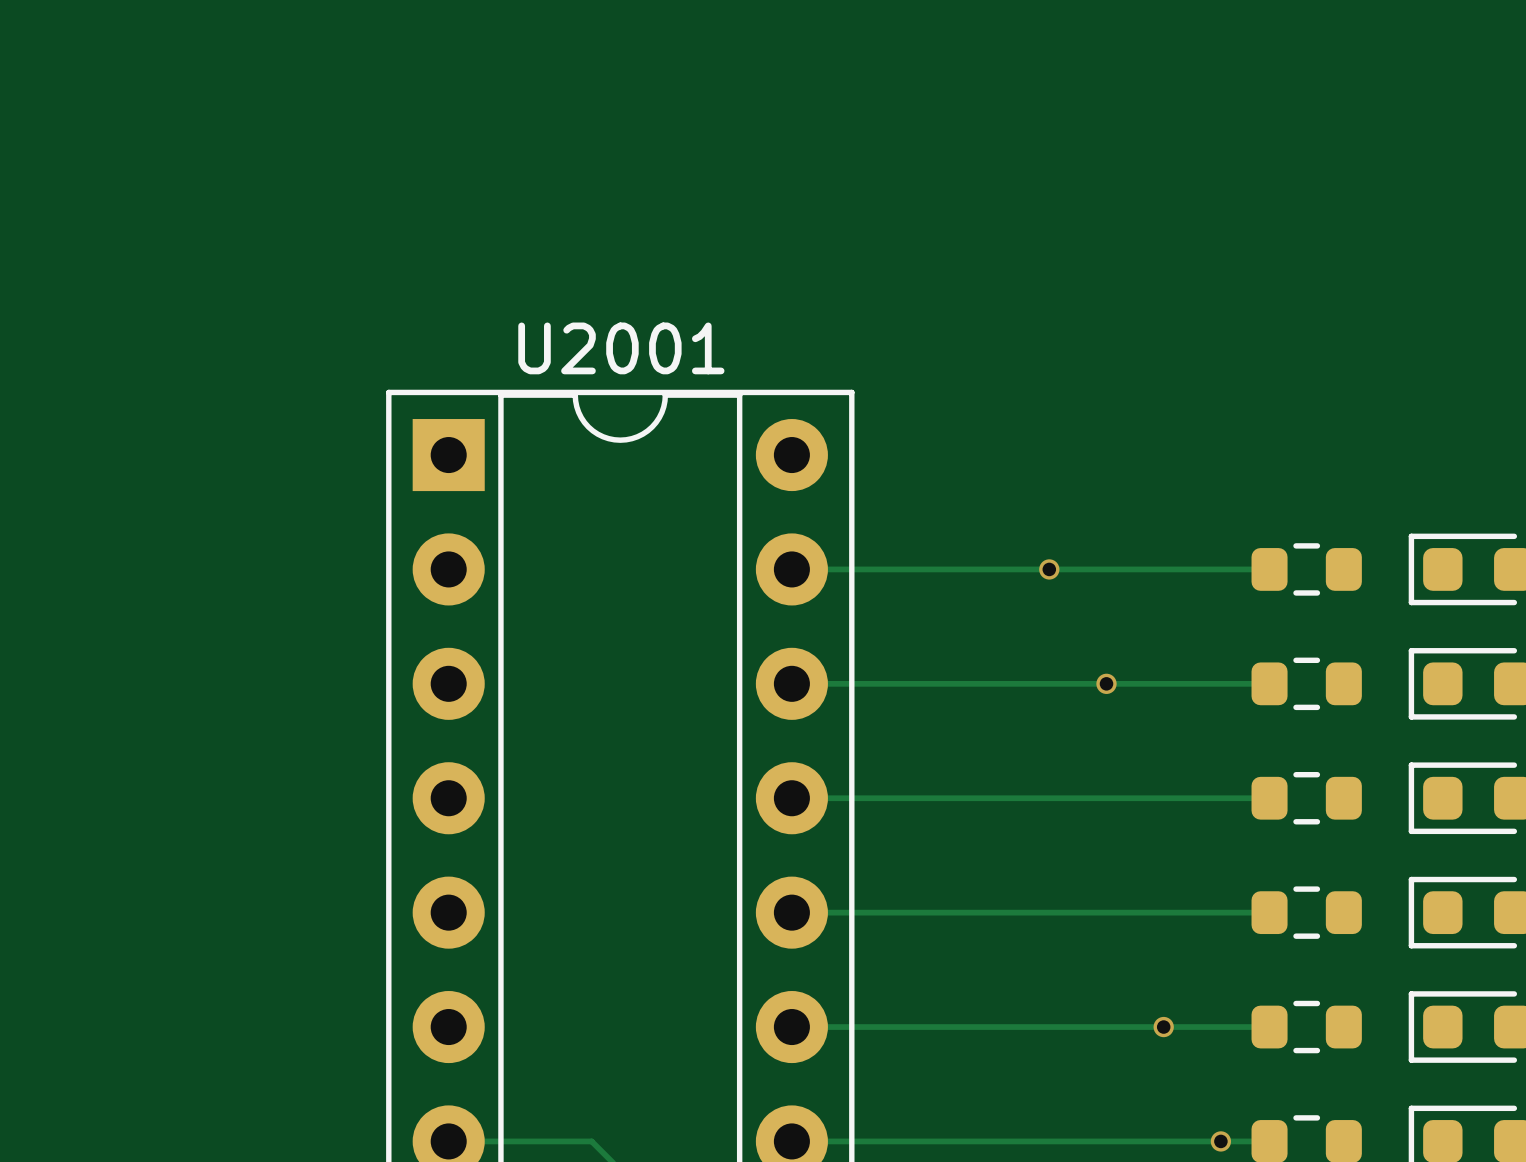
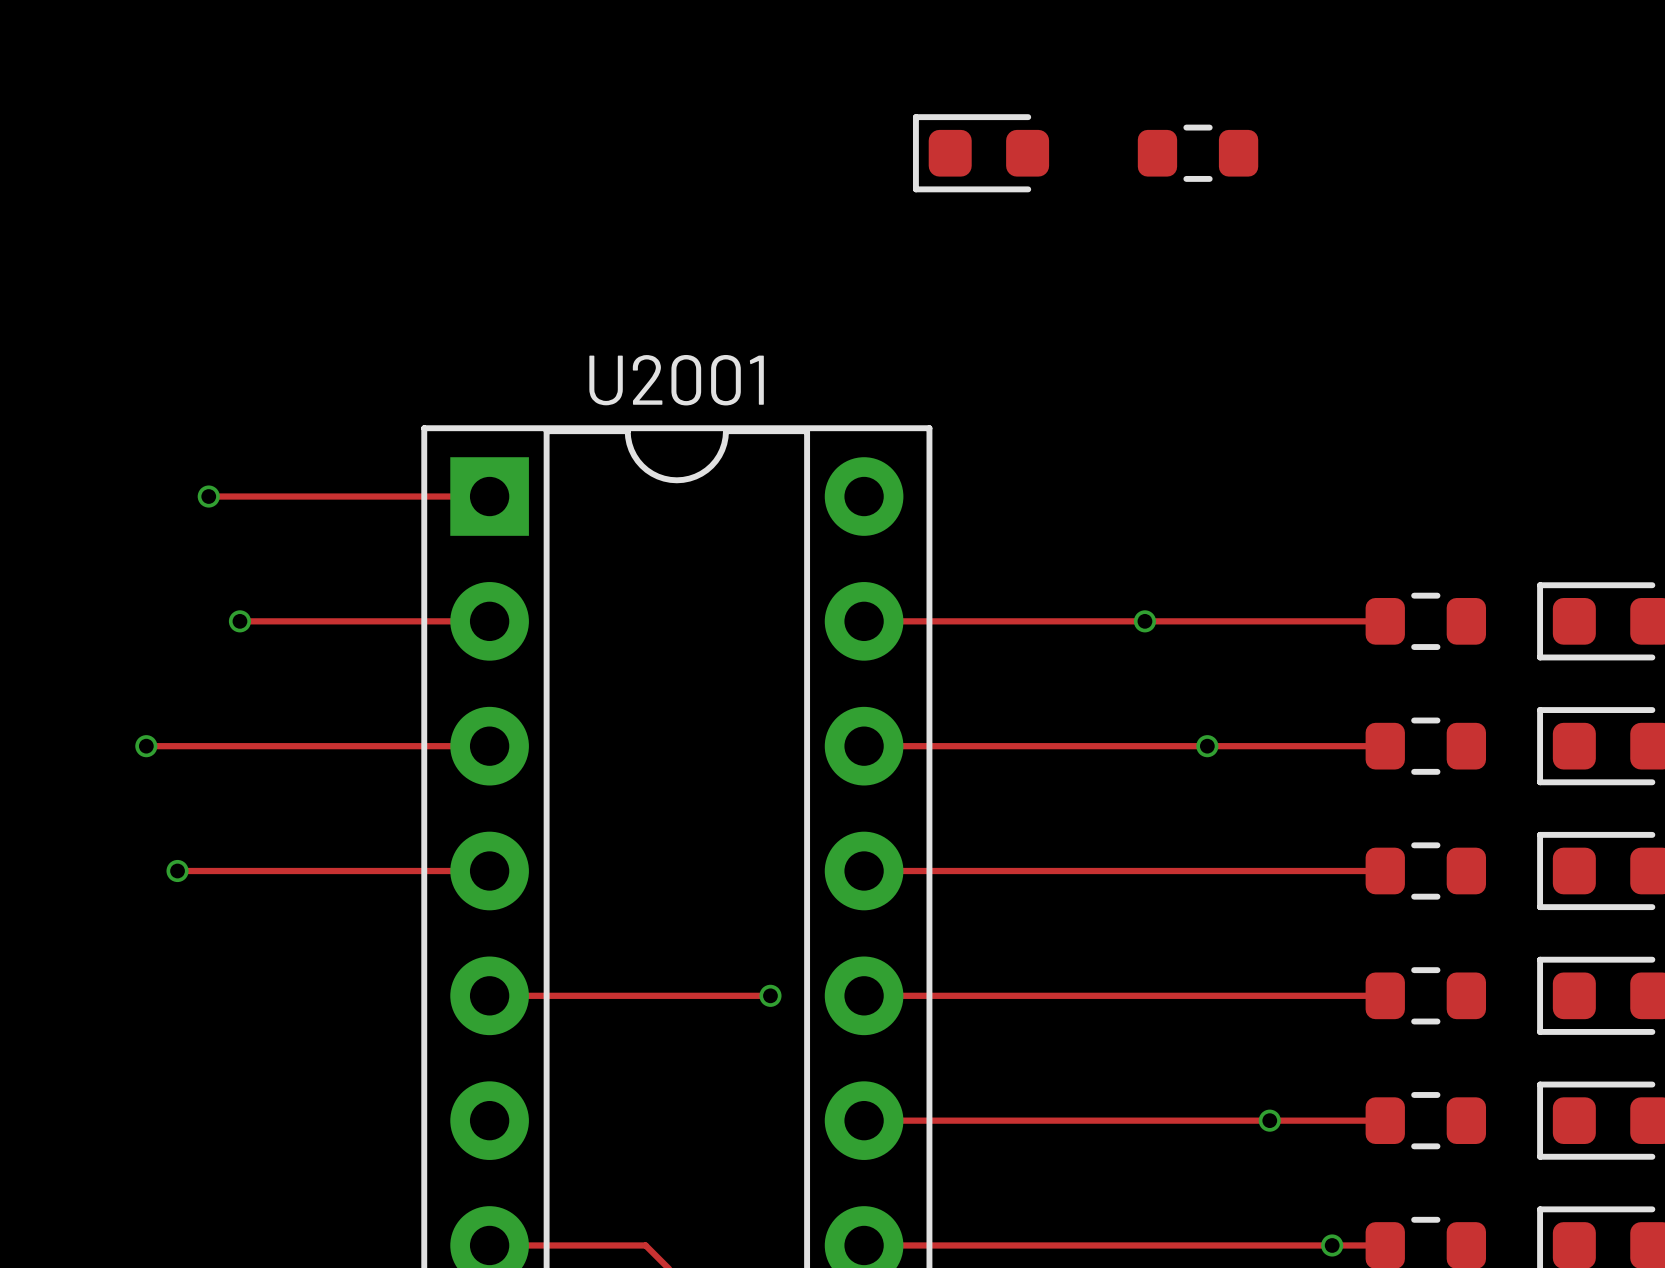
part: none -> (981, 153)
part: none -> (1198, 153)
track: none -> (208, 496) (489, 496)
via: none -> (208, 496)
track: none -> (239, 621) (489, 621)
via: none -> (239, 621)
track: none -> (146, 746) (489, 746)
via: none -> (146, 746)
track: none -> (177, 871) (489, 871)
via: none -> (177, 871)
track: none -> (489, 995) (770, 995)
via: none -> (770, 995)

